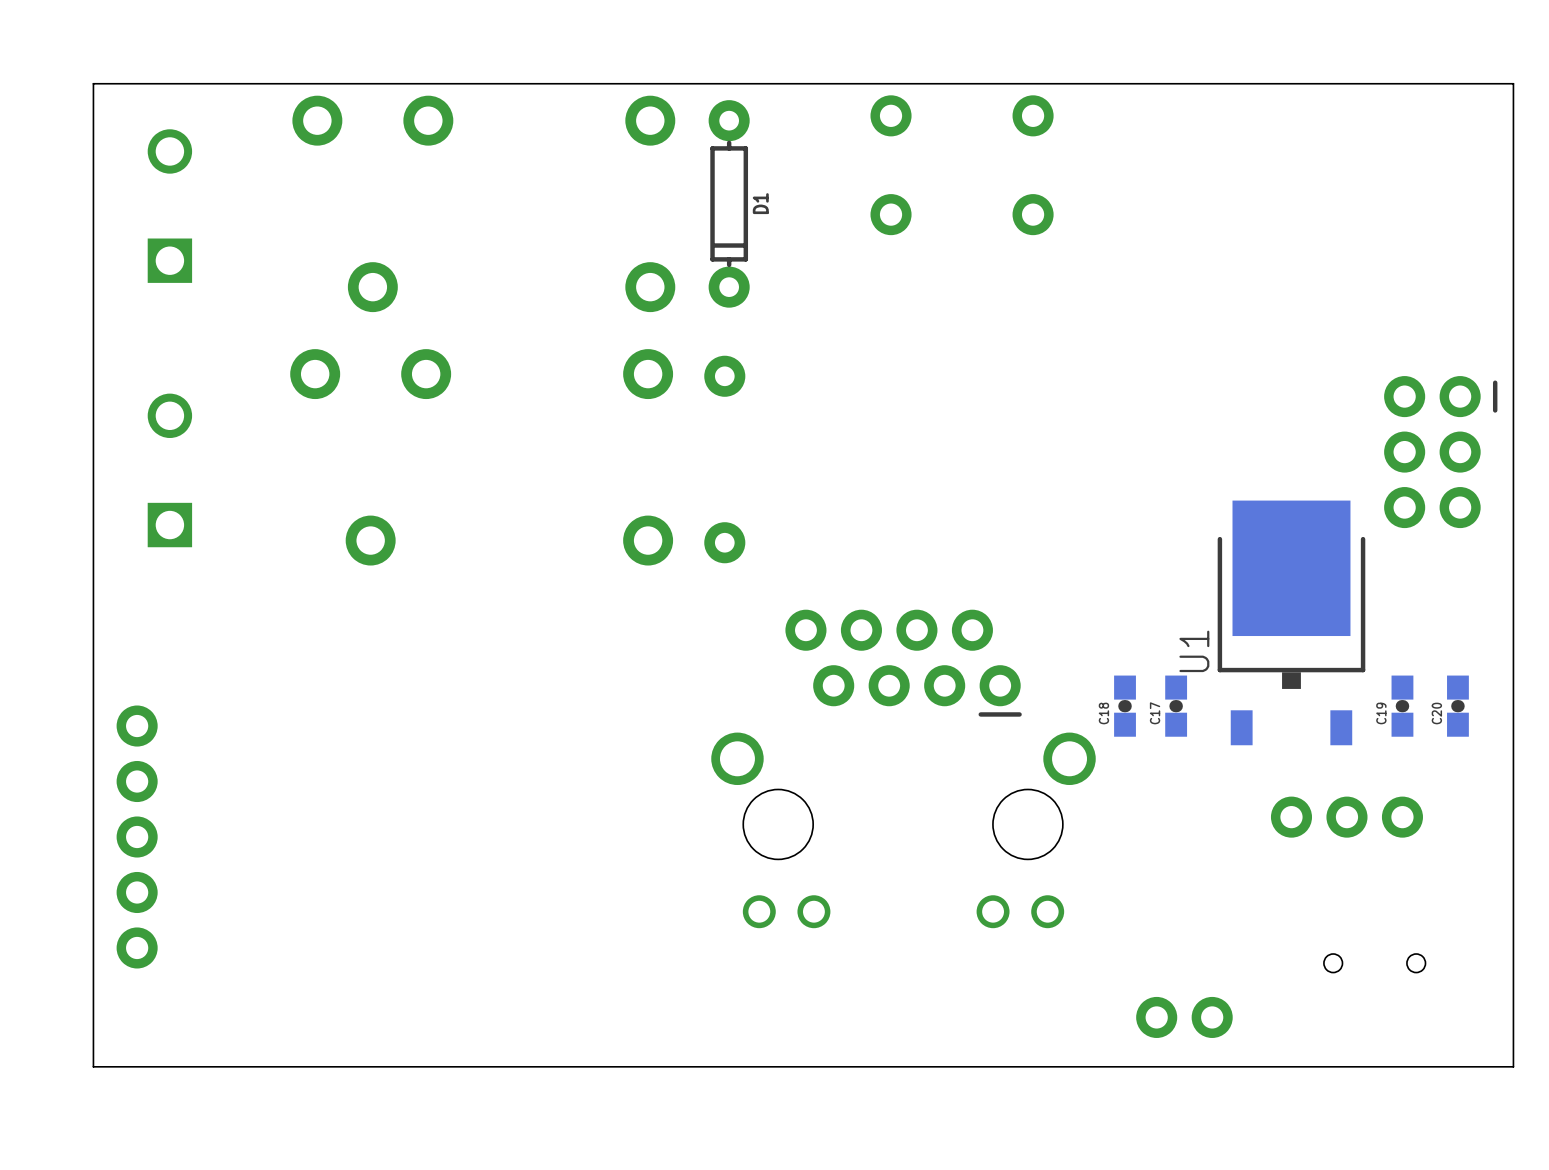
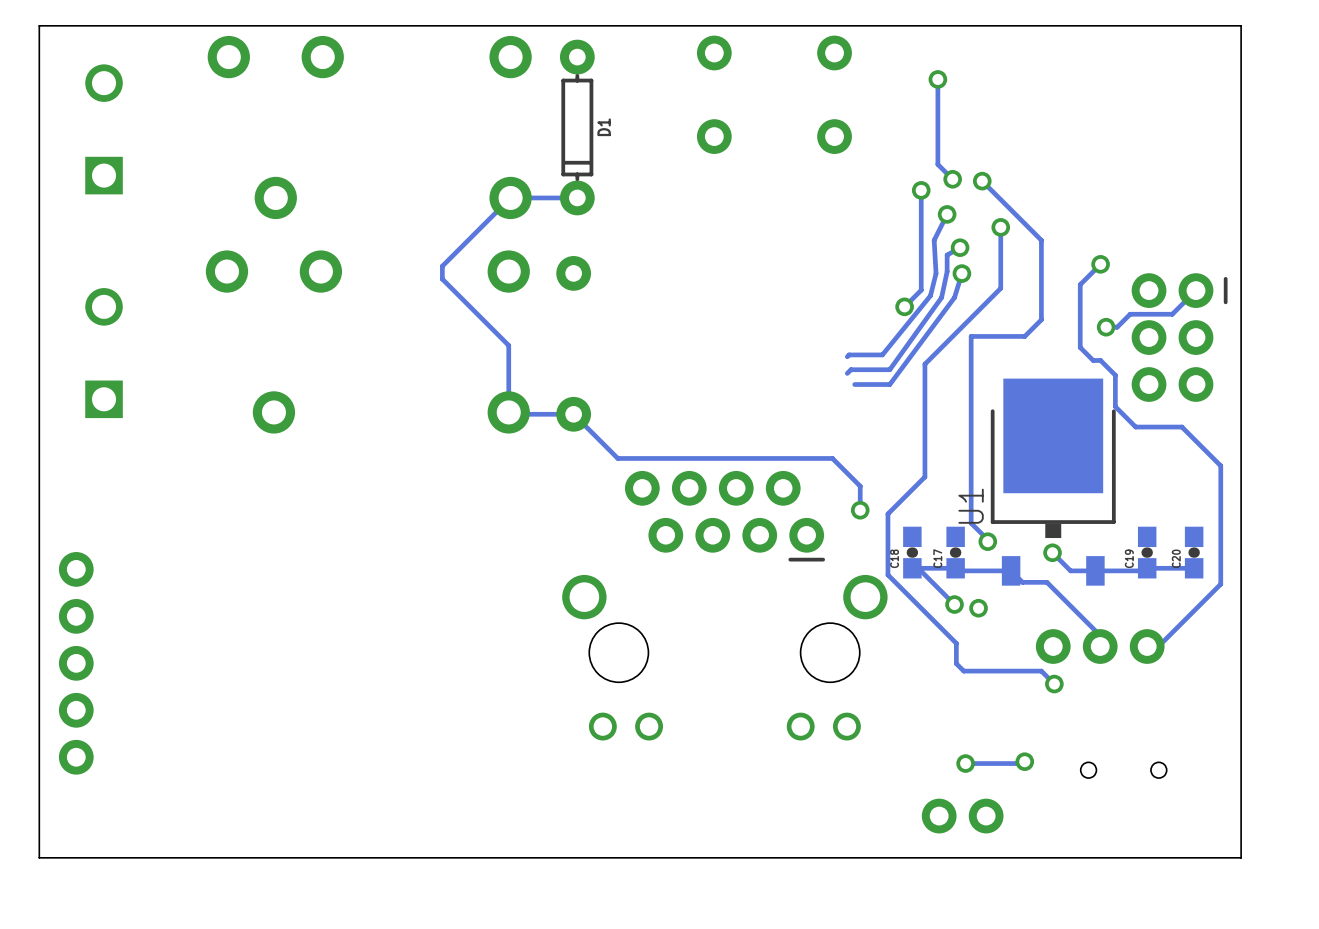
track: none -> (937, 79) (937, 164) (952, 179)
via: none -> (937, 79)
via: none -> (952, 179)
track: none -> (982, 181) (1041, 240) (1041, 319) (1024, 336) (971, 336) (971, 523) (987, 541)
via: none -> (982, 181)
track: none -> (921, 190) (921, 290) (904, 306)
via: none -> (921, 190)
track: none -> (577, 197) (510, 197) (442, 266) (442, 279) (508, 345) (508, 412) (510, 414) (573, 414) (617, 458) (832, 458) (860, 486) (860, 510)
track: none -> (947, 214) (934, 240) (936, 273) (930, 295) (882, 354) (849, 354) (847, 356)
via: none -> (947, 214)
track: none -> (1000, 227) (1000, 288) (924, 364) (924, 476) (887, 513) (887, 574) (956, 643) (956, 663) (963, 671) (1041, 671) (1054, 684)
via: none -> (1000, 227)
track: none -> (960, 247) (947, 255) (947, 271) (941, 297) (889, 369) (850, 369) (847, 373)
via: none -> (960, 247)
track: none -> (1100, 264) (1080, 284) (1080, 347) (1093, 360) (1100, 360) (1115, 375) (1115, 406) (1135, 427) (1181, 427) (1220, 465) (1220, 584) (1158, 646) (1147, 646)
via: none -> (1100, 264)
track: none -> (961, 273) (954, 297) (889, 384) (854, 384)
via: none -> (961, 273)
track: none -> (1195, 290) (1172, 314) (1130, 314) (1117, 327) (1106, 327)
via: none -> (904, 306)
via: none -> (1106, 327)
via: none -> (860, 510)
via: none -> (987, 541)
track: none -> (1052, 552) (1070, 570) (1144, 570) (1147, 568) (1194, 568)
via: none -> (1052, 552)
track: none -> (912, 568) (1011, 570) (1022, 582) (1046, 582) (1100, 635) (1100, 646)
track: none -> (918, 568) (954, 604)
via: none -> (954, 604)
via: none -> (978, 608)
via: none -> (1054, 684)
track: none -> (1024, 761) (1017, 763) (965, 763)
via: none -> (1024, 761)
via: none -> (965, 763)

